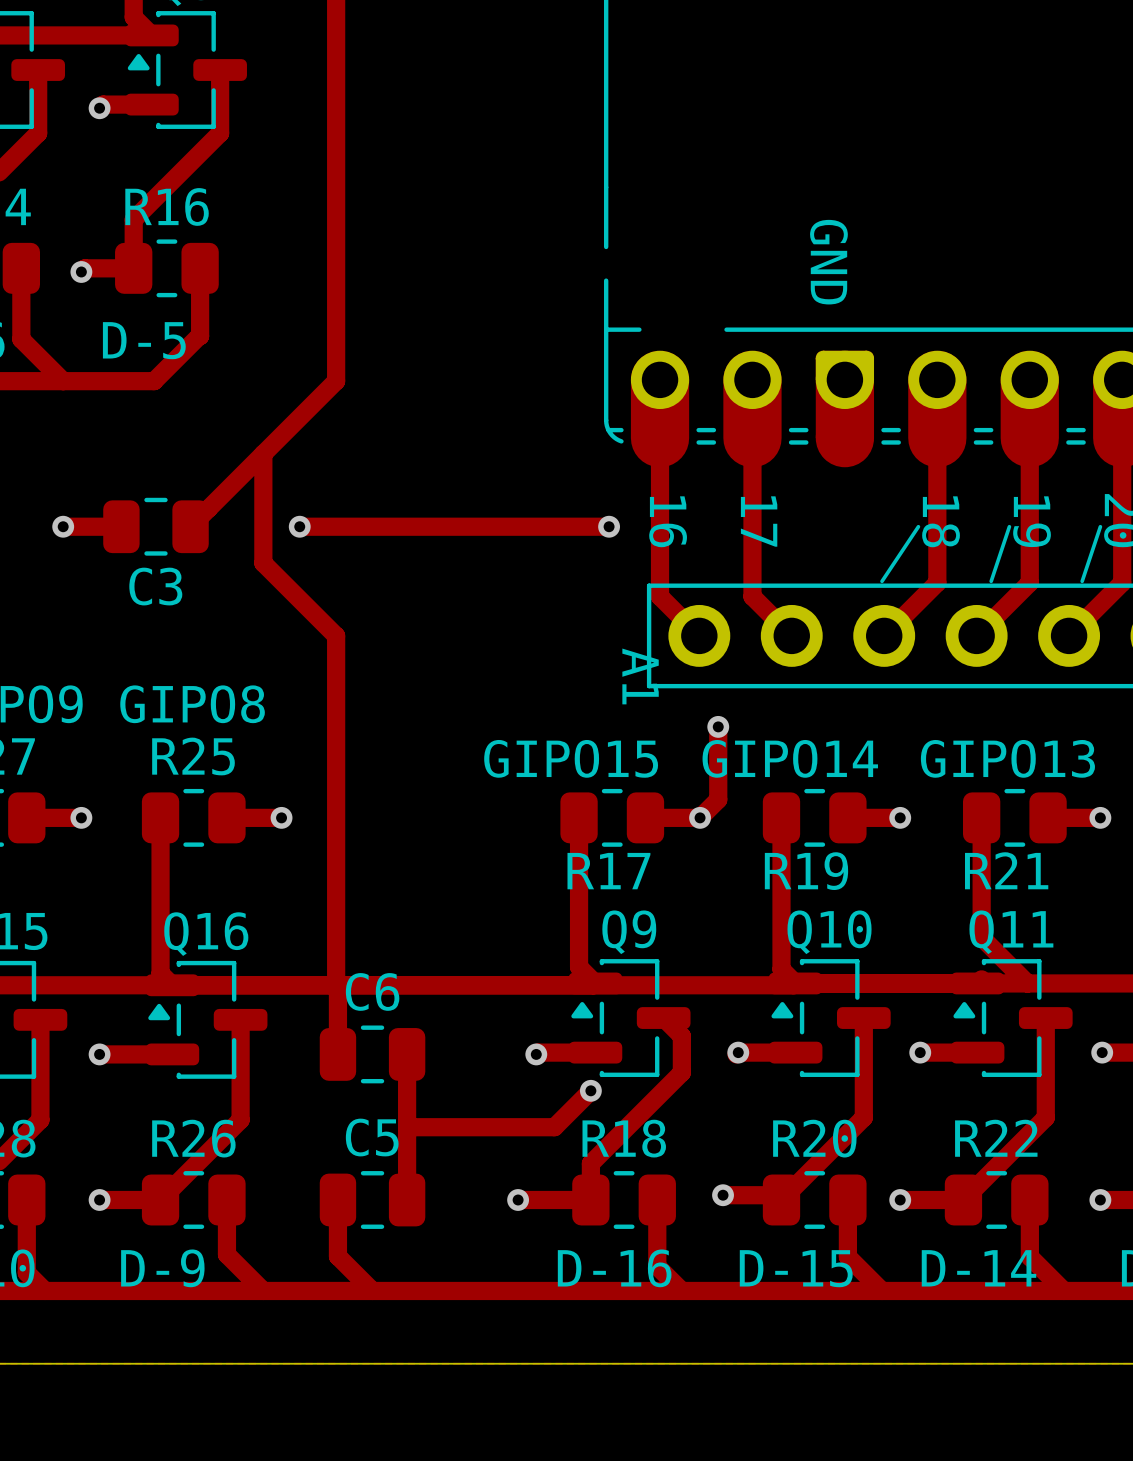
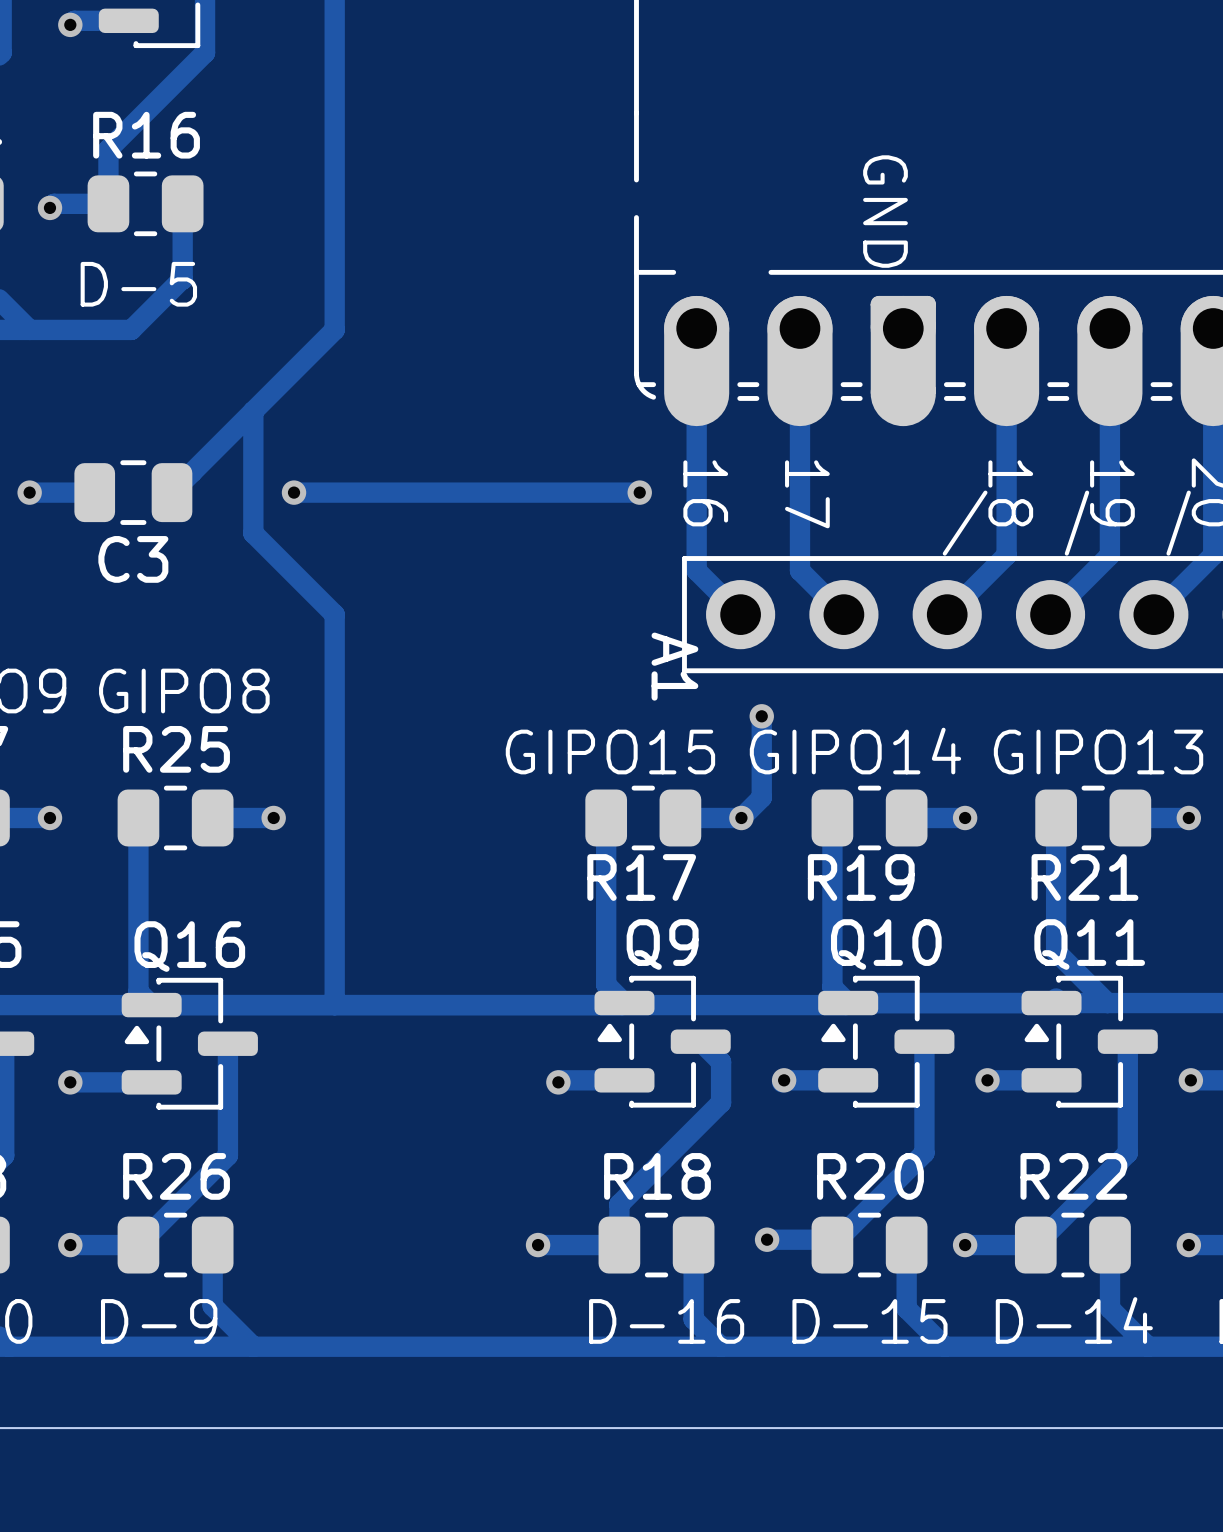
track: (336, 985) (337, 987) (337, 1054) -> none
C6: (372, 1054) -> none
track: (407, 1054) (407, 1199) -> none
track: (590, 1090) (554, 1127) (407, 1127) -> none
via: (590, 1090) -> none
track: (337, 1199) (337, 1256) (372, 1290) -> none
C5: (372, 1199) -> none

